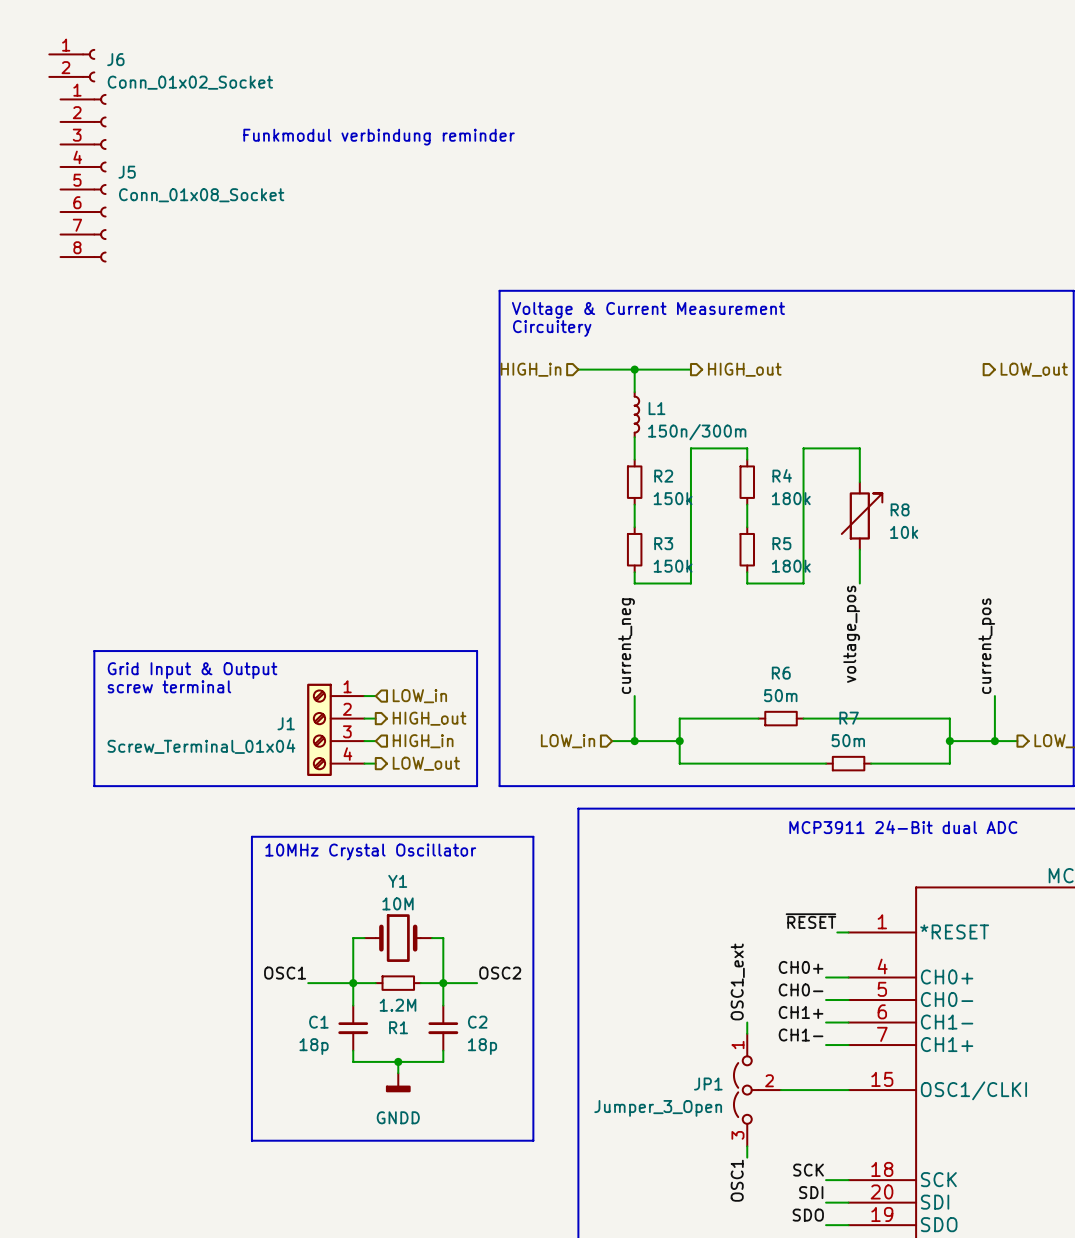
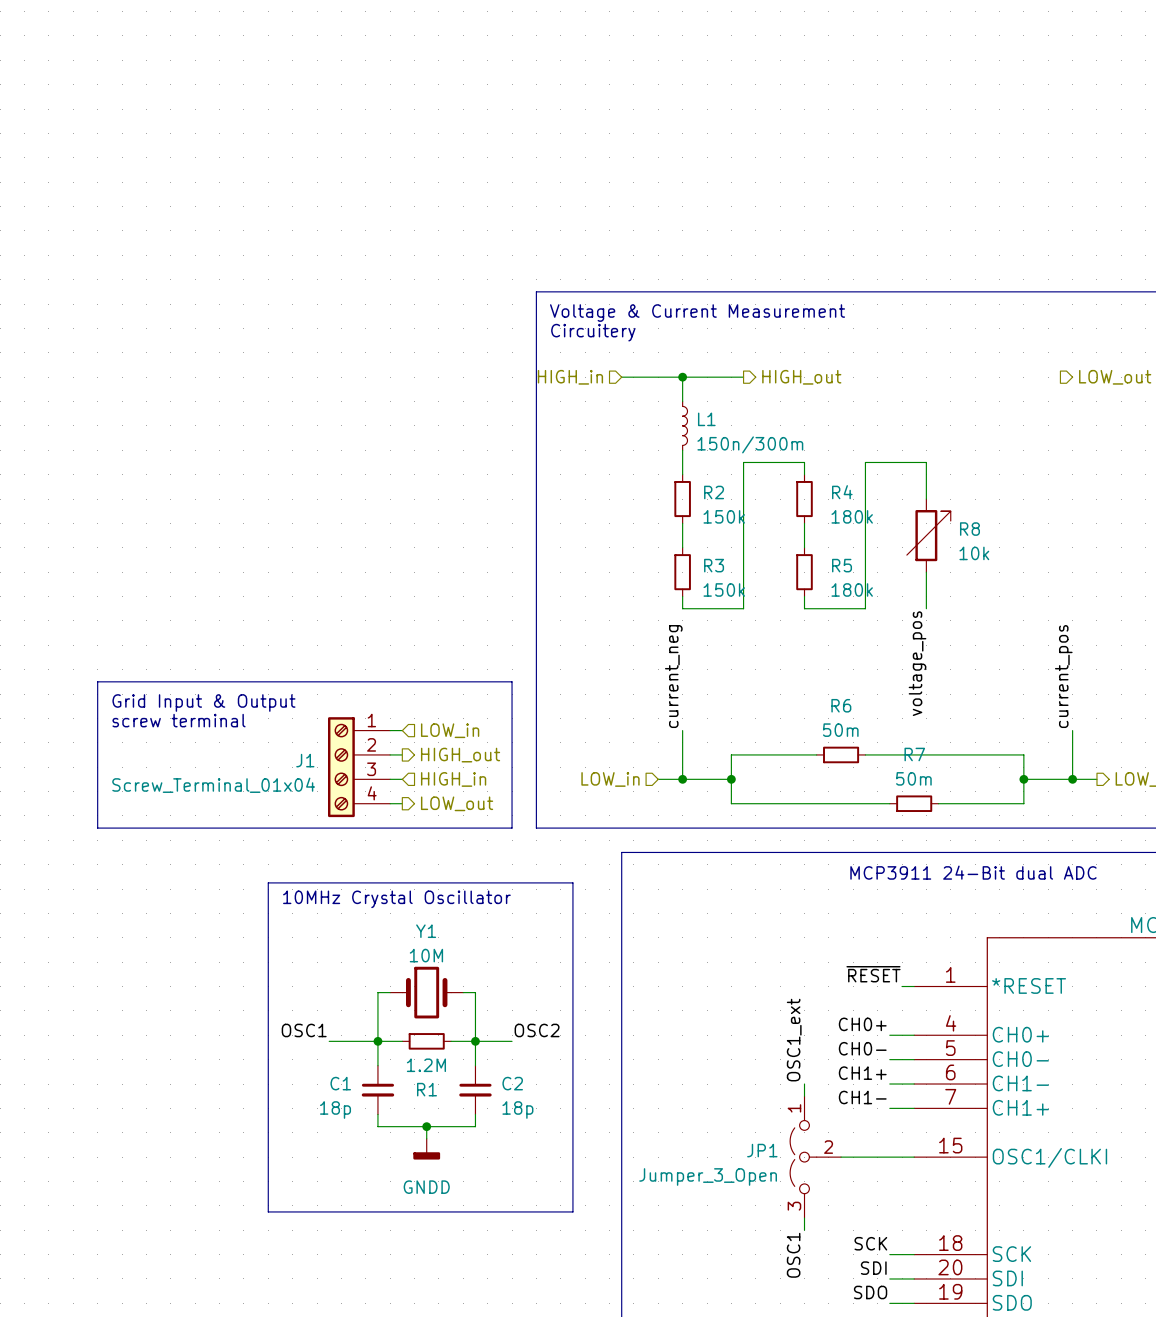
J6: Conn_01x02_Socket (72, 65) -> none
text: Funkmodul verbindung reminder (379, 137) -> none
J5: Conn_01x08_Socket (83, 178) -> none

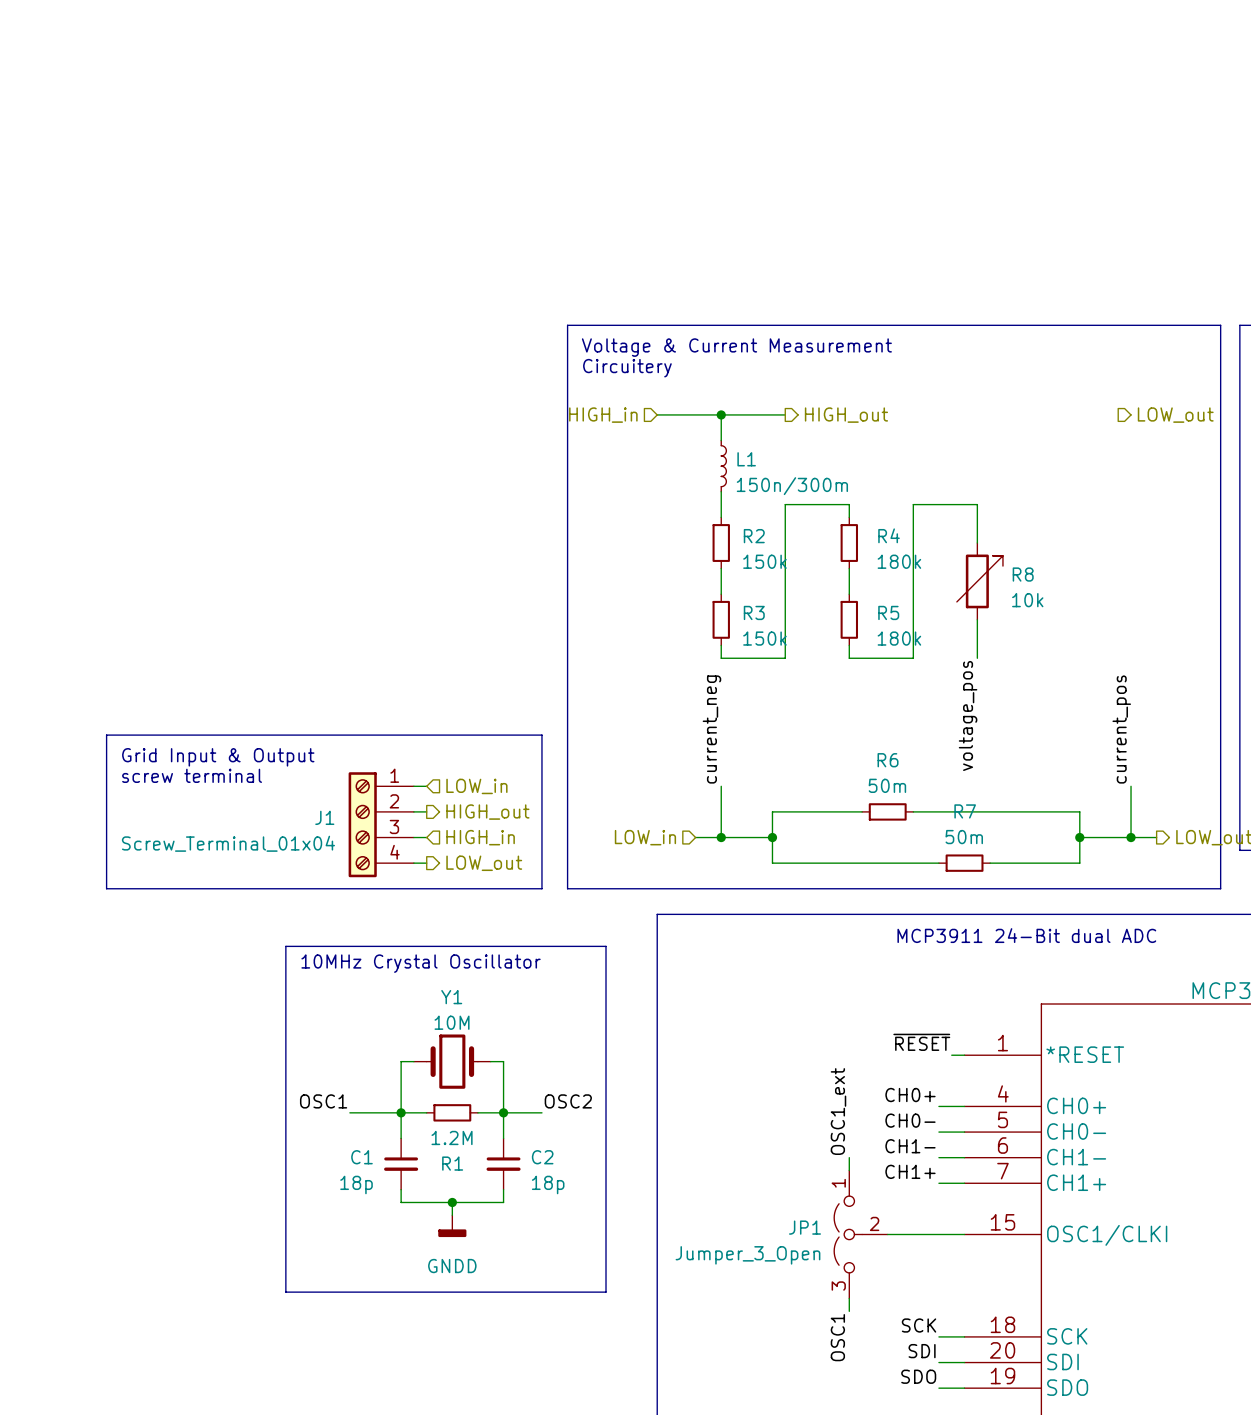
label: CH1+ (862, 1073) -> CH1- (910, 1146)
label: CH1- (862, 1097) -> CH1+ (910, 1171)

